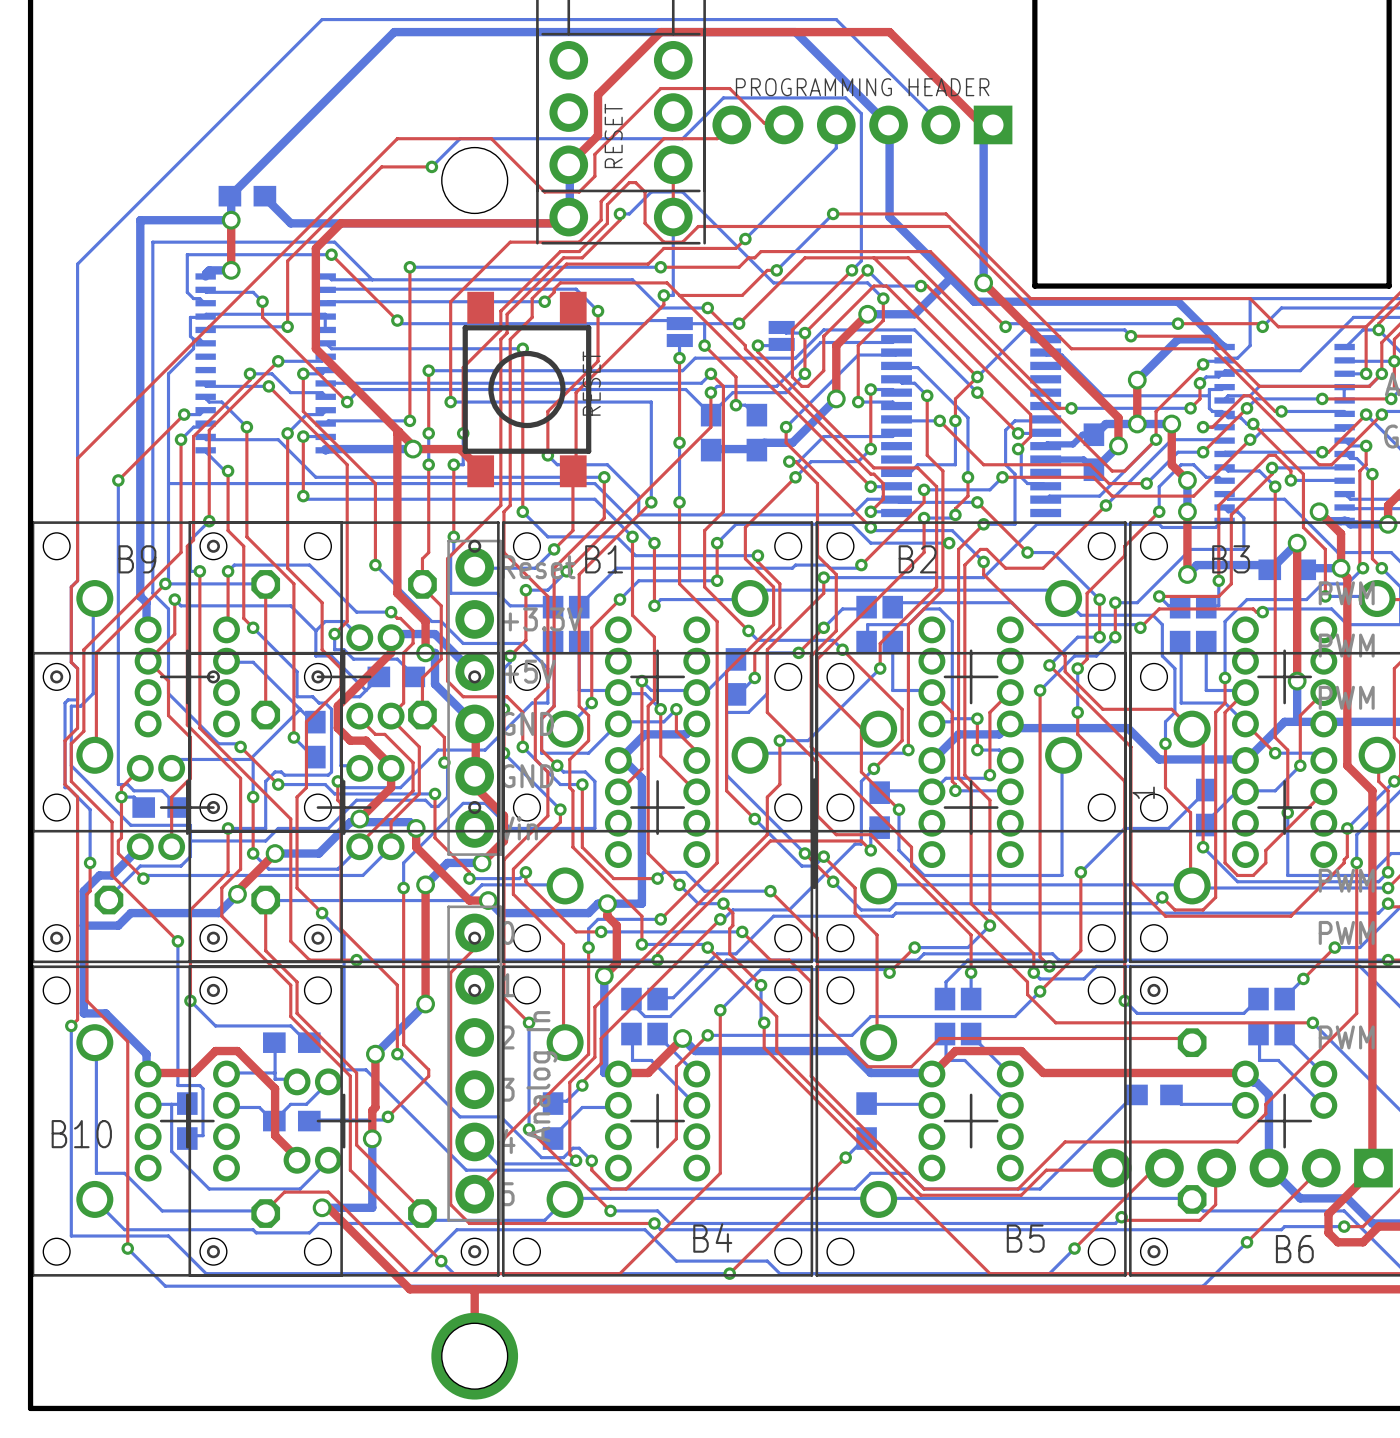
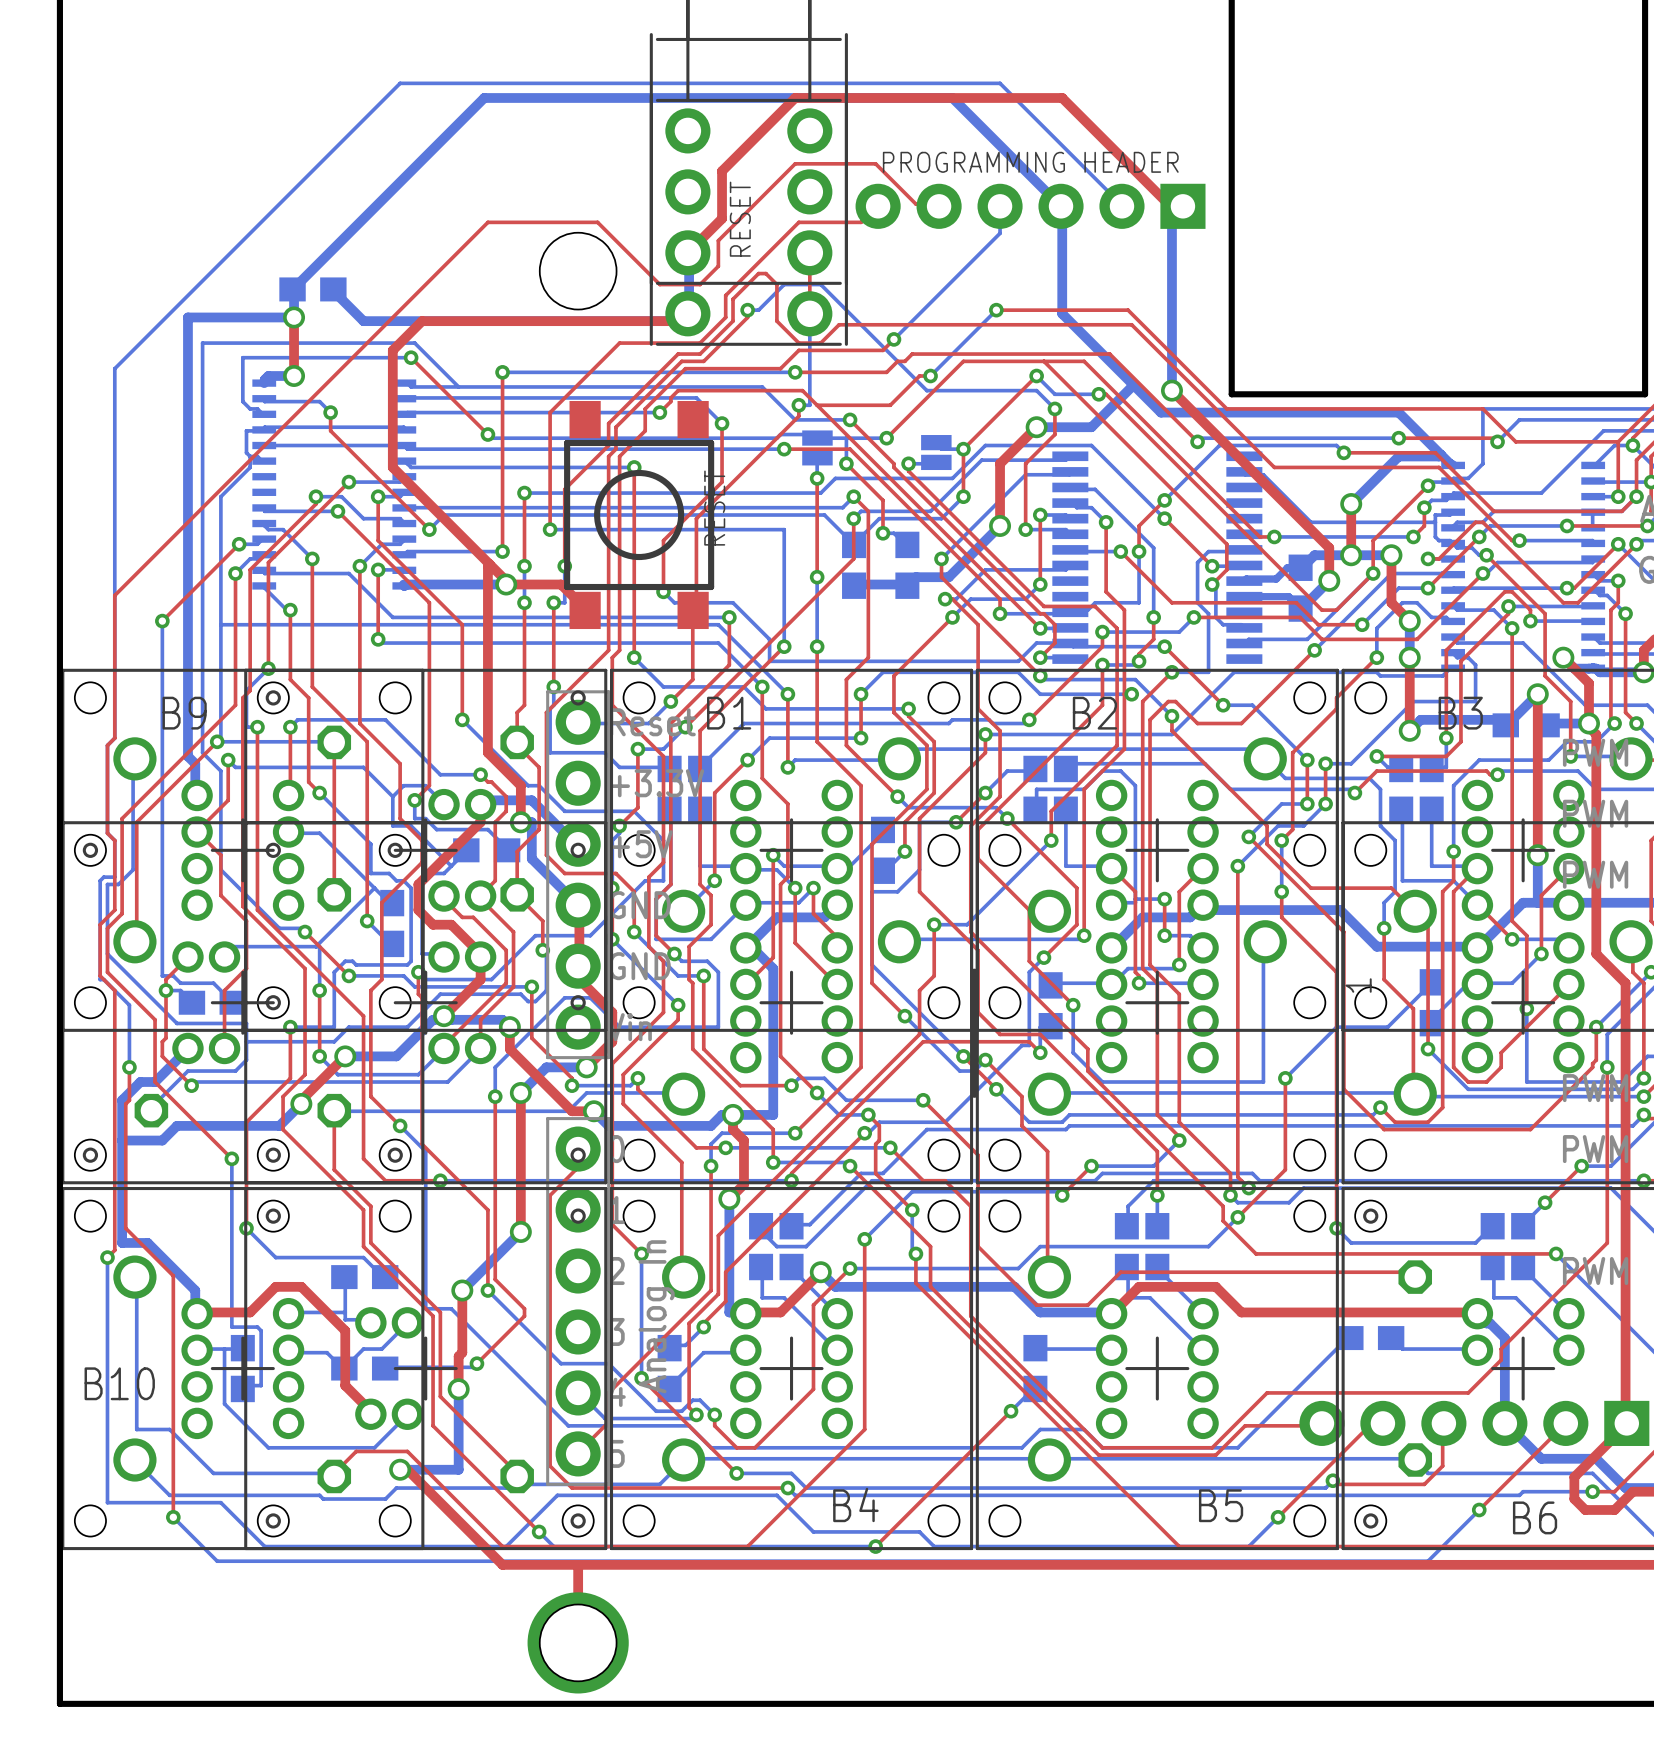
bottom track: (431, 166) (460, 138) (682, 138) (723, 97) (845, 97) (861, 113) (861, 260) (851, 270) -> none
top track: (431, 166) (381, 166) (287, 260) (287, 326) -> none
via: (431, 166) -> none
top track: (851, 270) (792, 329) (792, 376) (801, 386) (808, 386) (823, 370) (823, 336) (873, 286) (886, 286) (977, 376) -> none
via: (851, 270) -> none
bottom track: (325, 316) (325, 329) -> (784, 449) (407, 449) (404, 445)
bottom track: (287, 326) (209, 326) (206, 329) -> (403, 445) (264, 445)
via: (287, 326) -> none
top track: none -> (784, 449) (850, 449) (1000, 599) (1000, 613)
via: none -> (784, 449)
bottom track: none -> (1070, 612) (1000, 613)
via: none -> (1000, 613)

